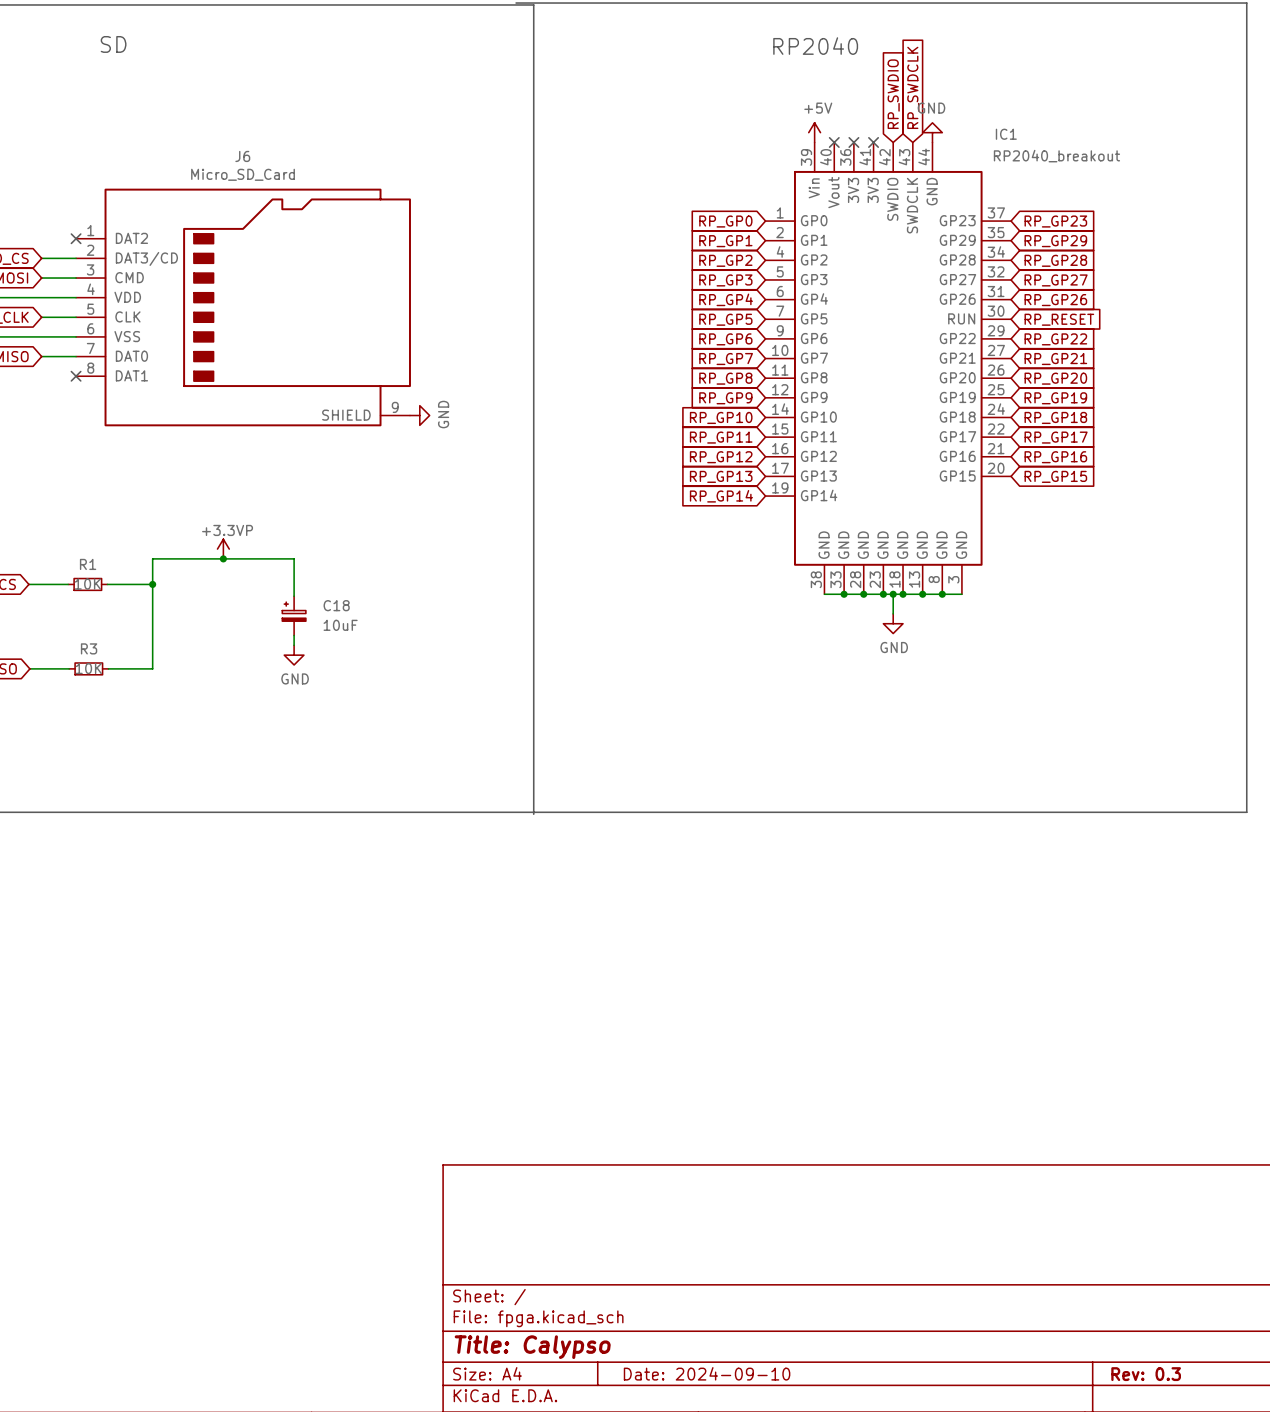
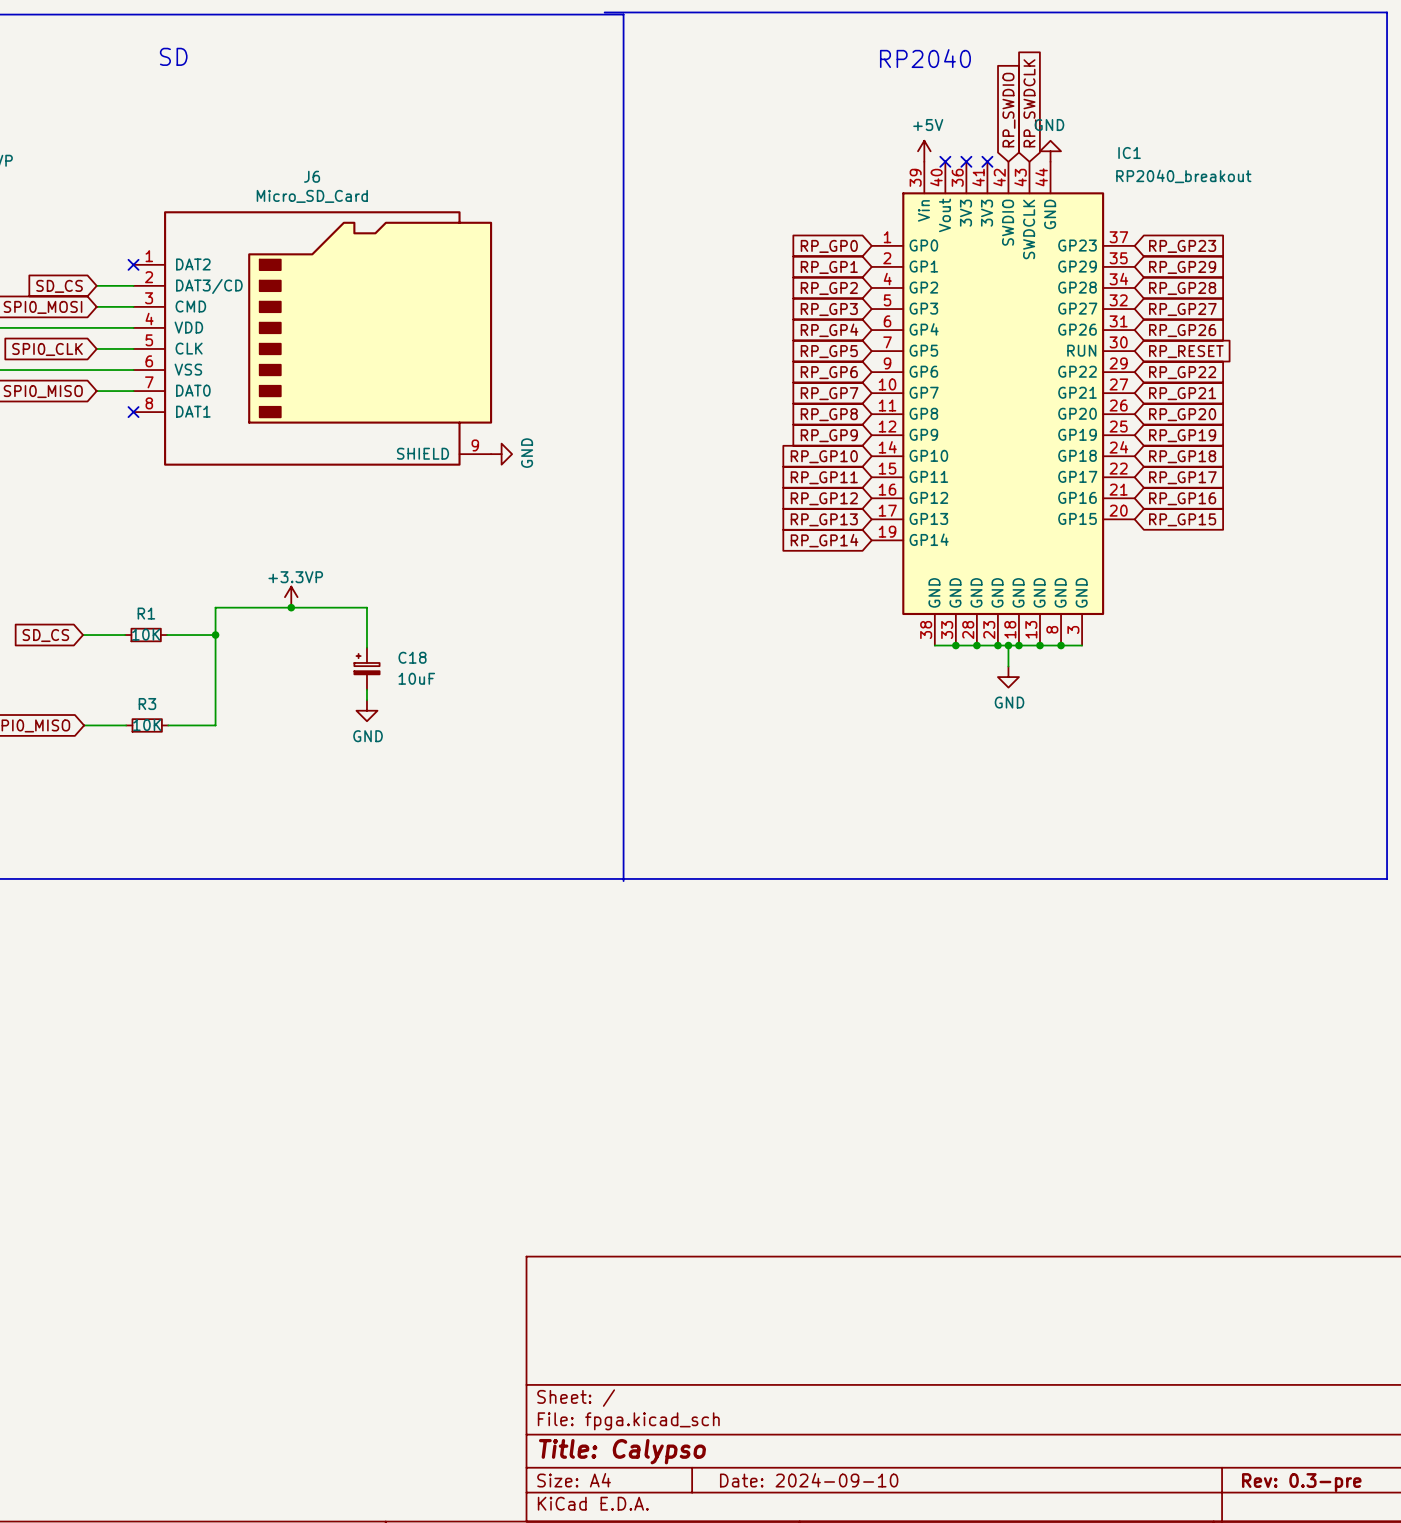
title block: Rev: 0.3 (1146, 1374) -> Rev: 0.3-pre (1301, 1482)

